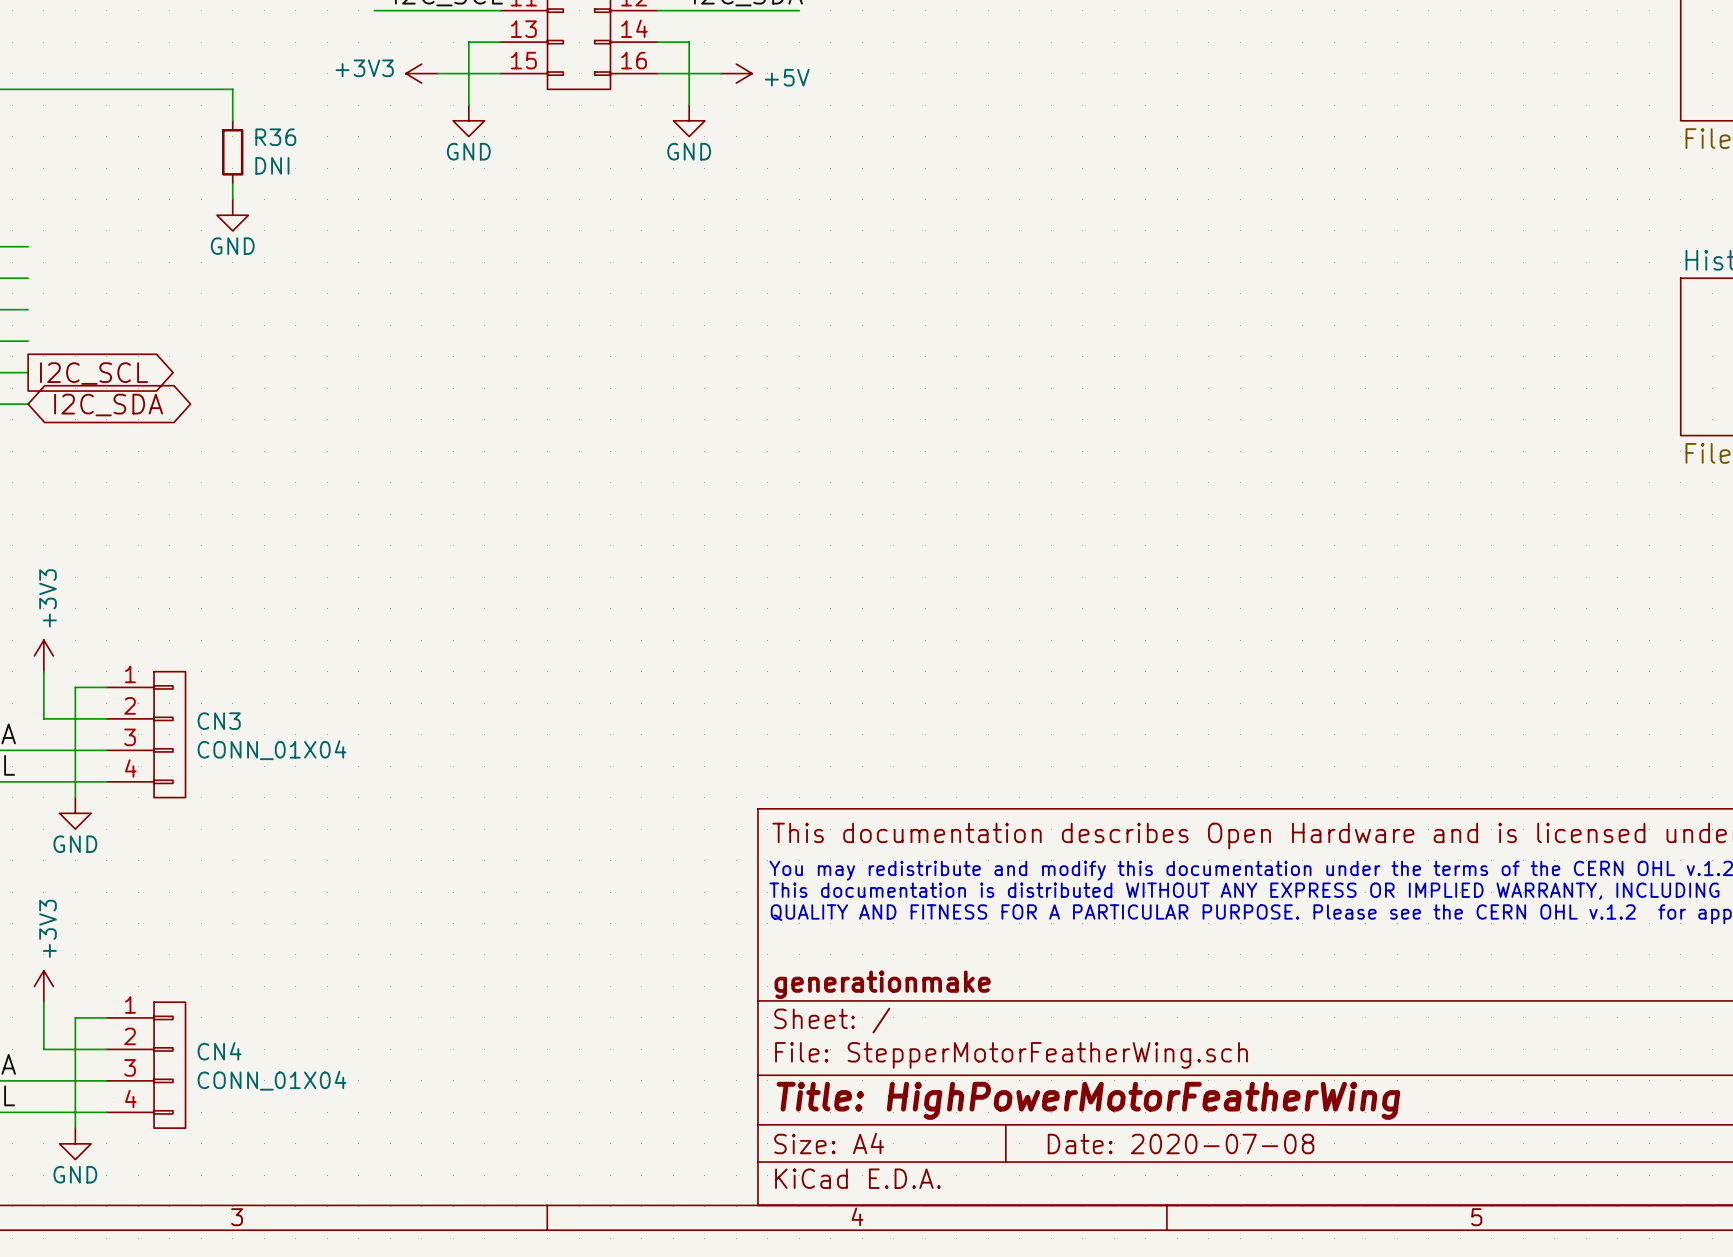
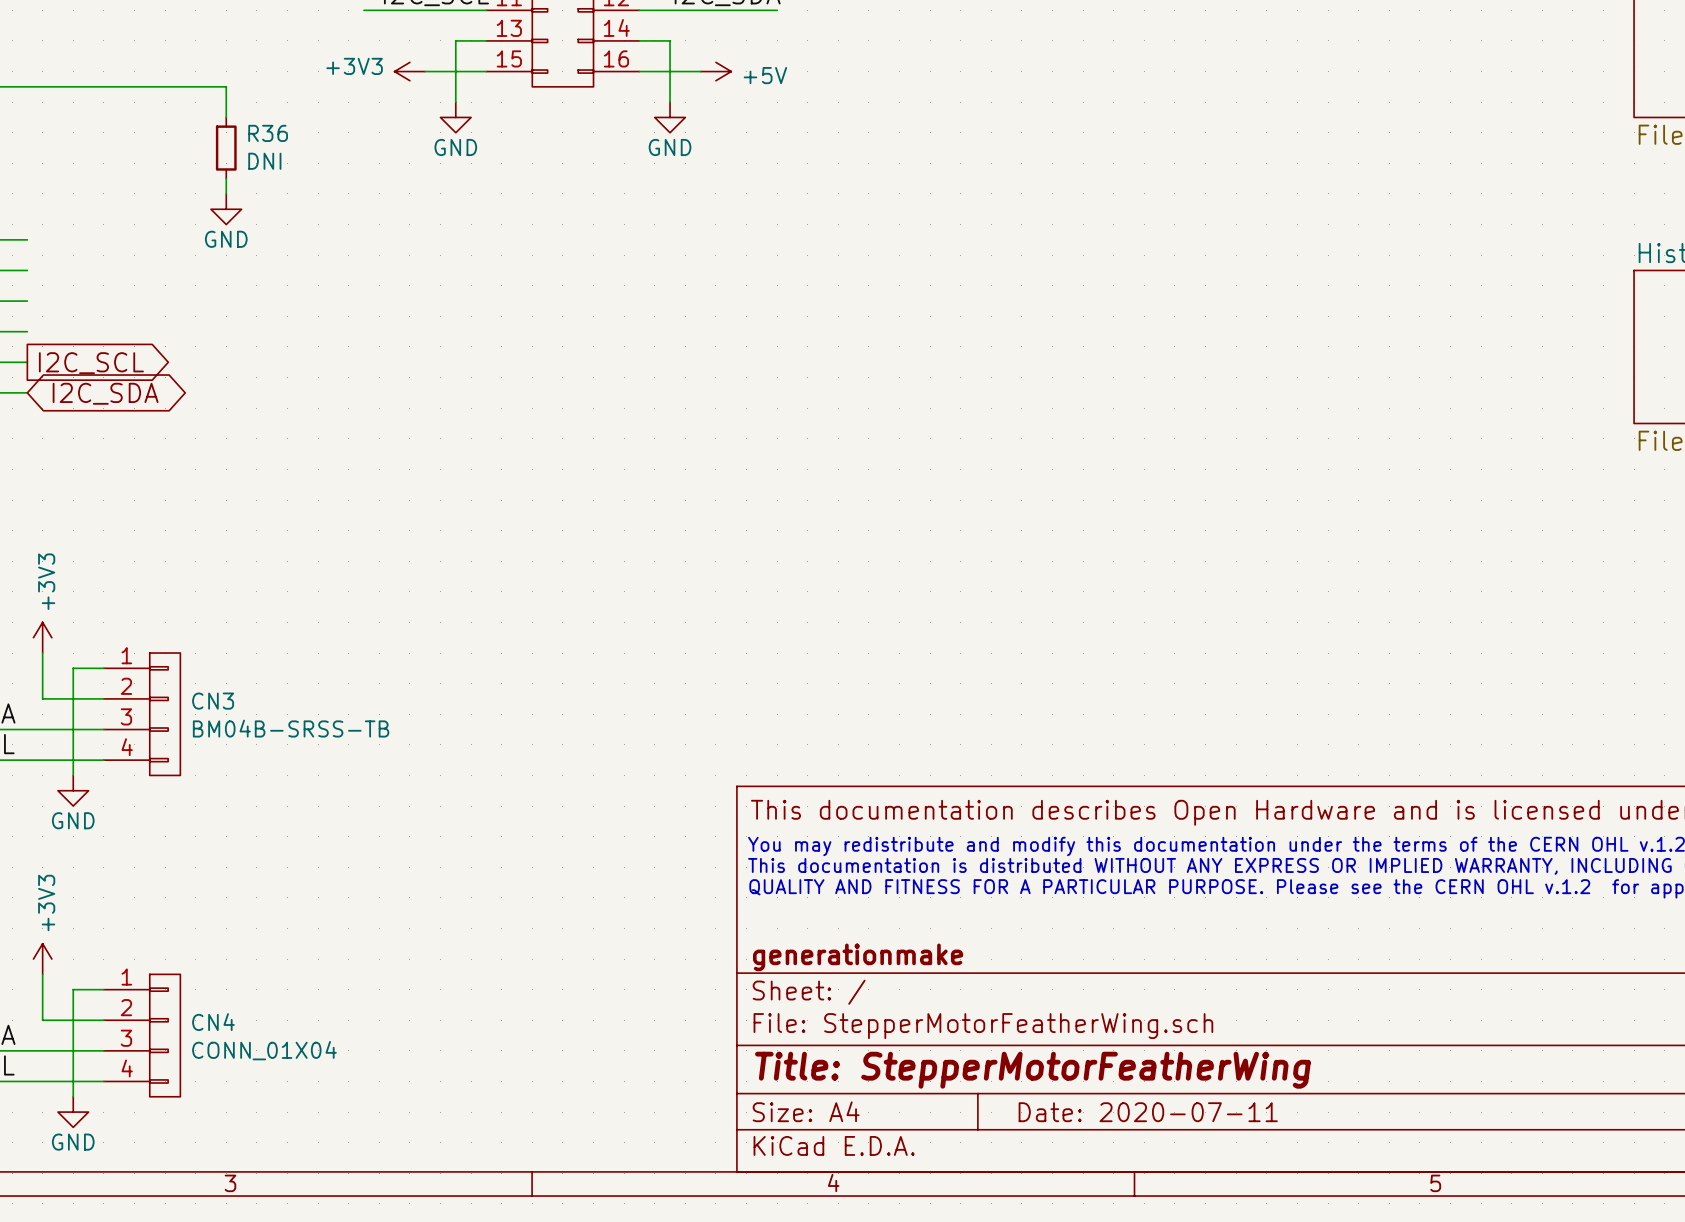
CN3 value: CONN_01X04 (272, 750) -> BM04B-SRSS-TB (291, 728)
title block: Title: HighPowerMotorFeatherWing (1088, 1100) -> Title: StepperMotorFeatherWing (1032, 1070)
title block: Date: 2020-07-08 (1181, 1143) -> Date: 2020-07-11 (1148, 1112)

